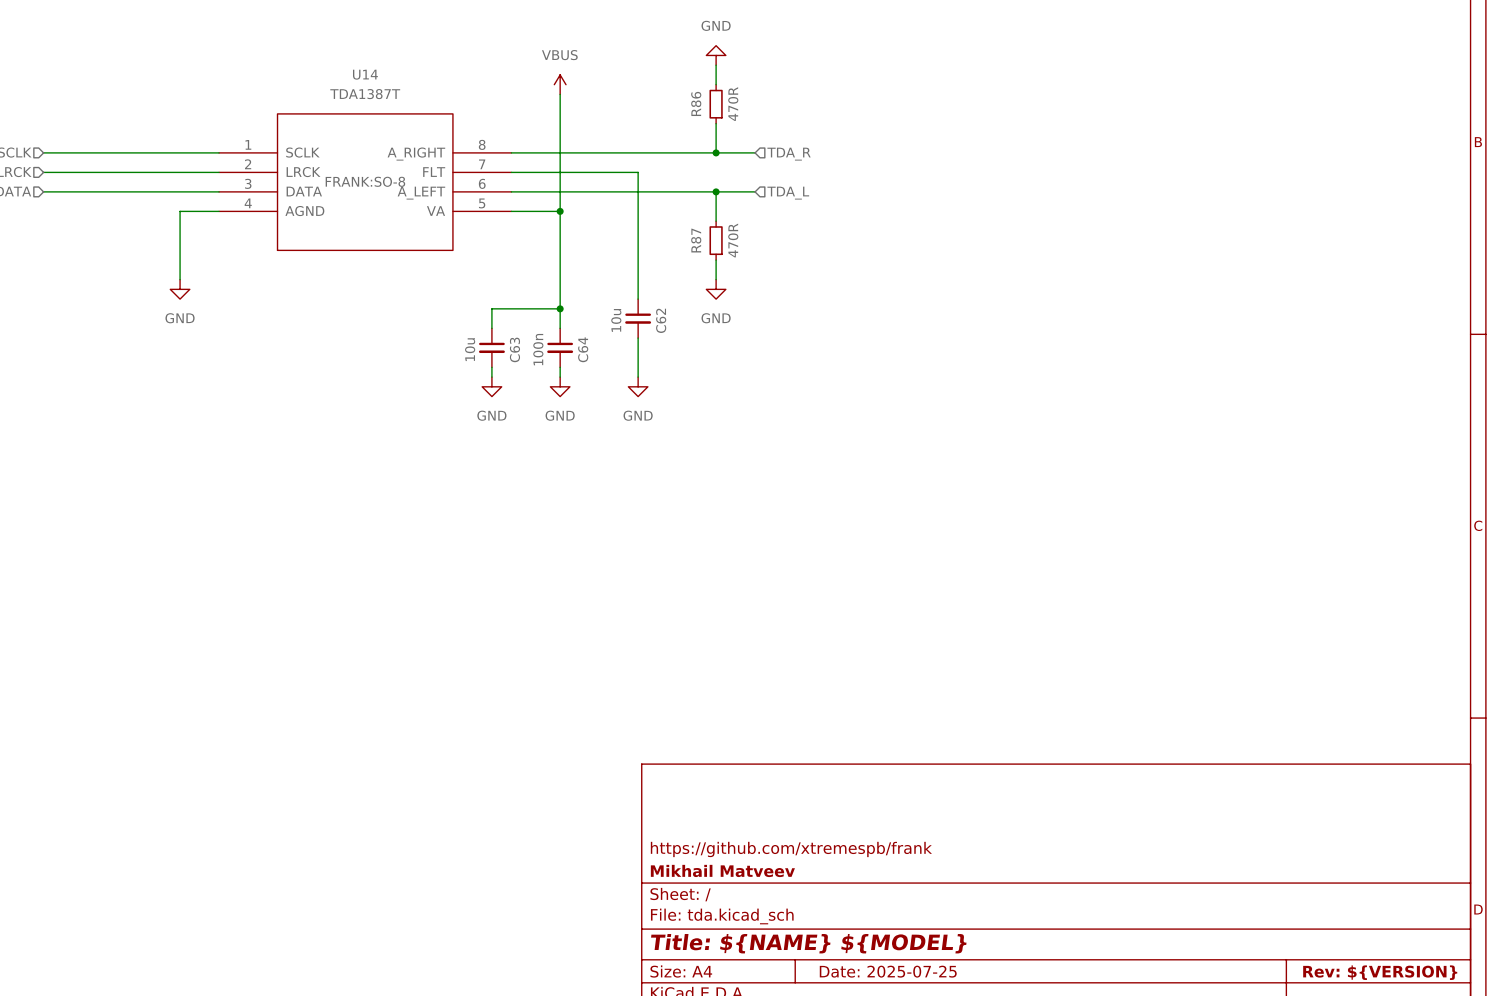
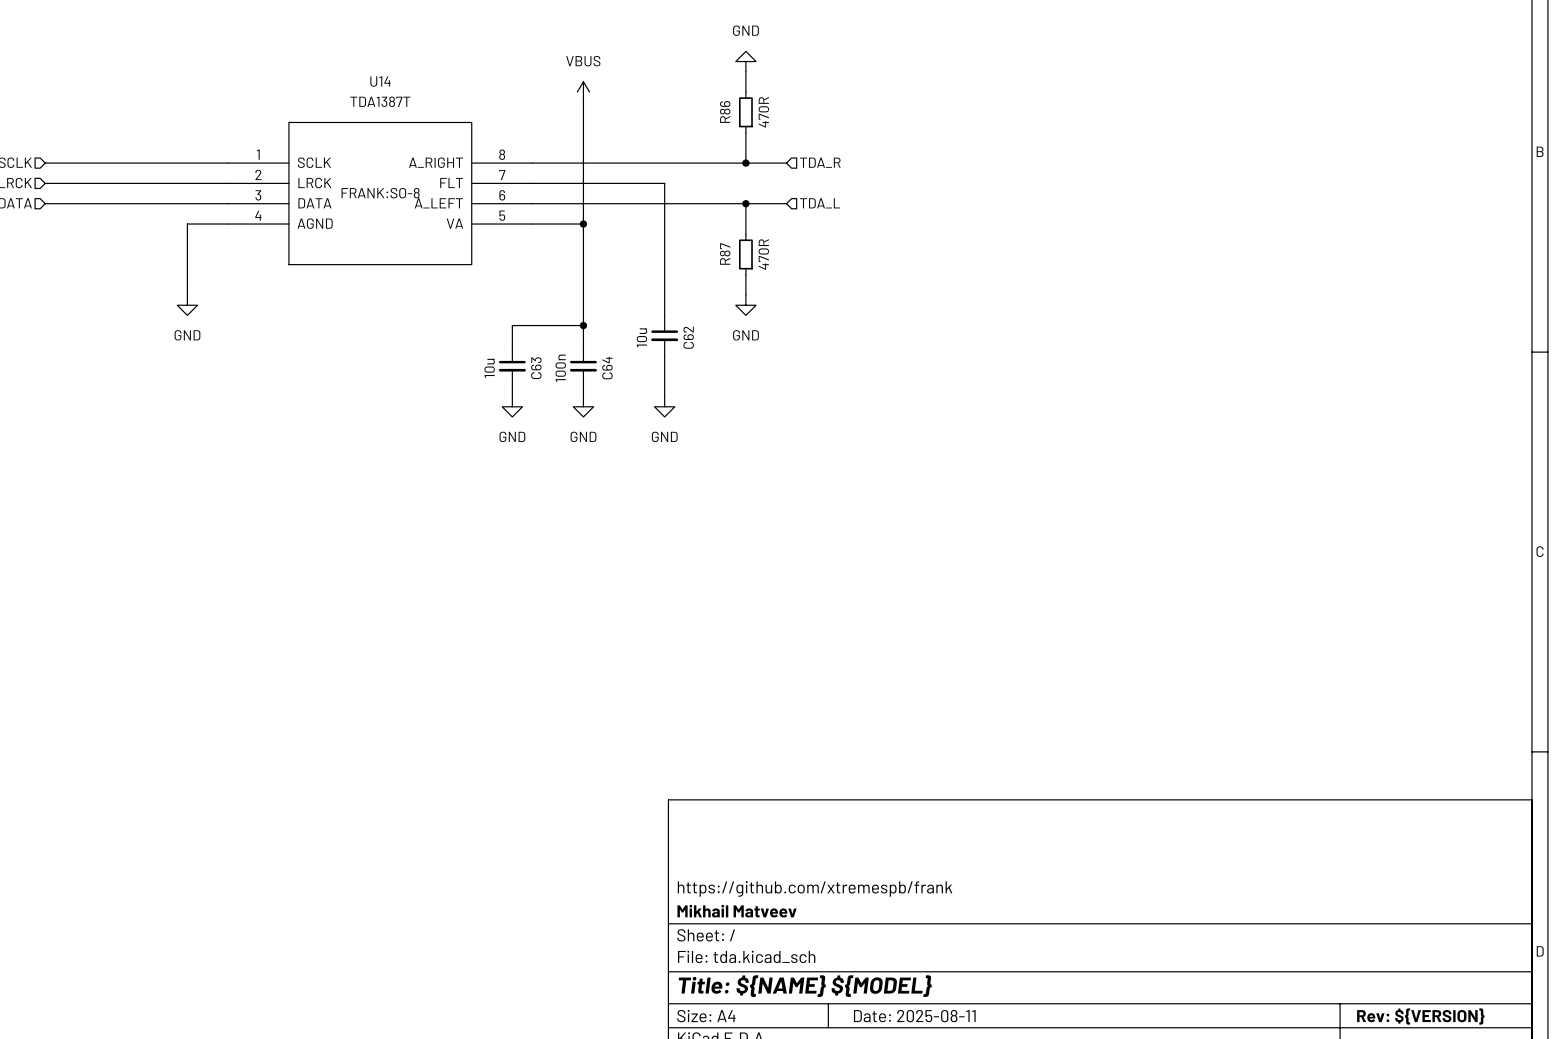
title block: Date: 2025-07-25 (888, 971) -> Date: 2025-08-11 (914, 1016)

